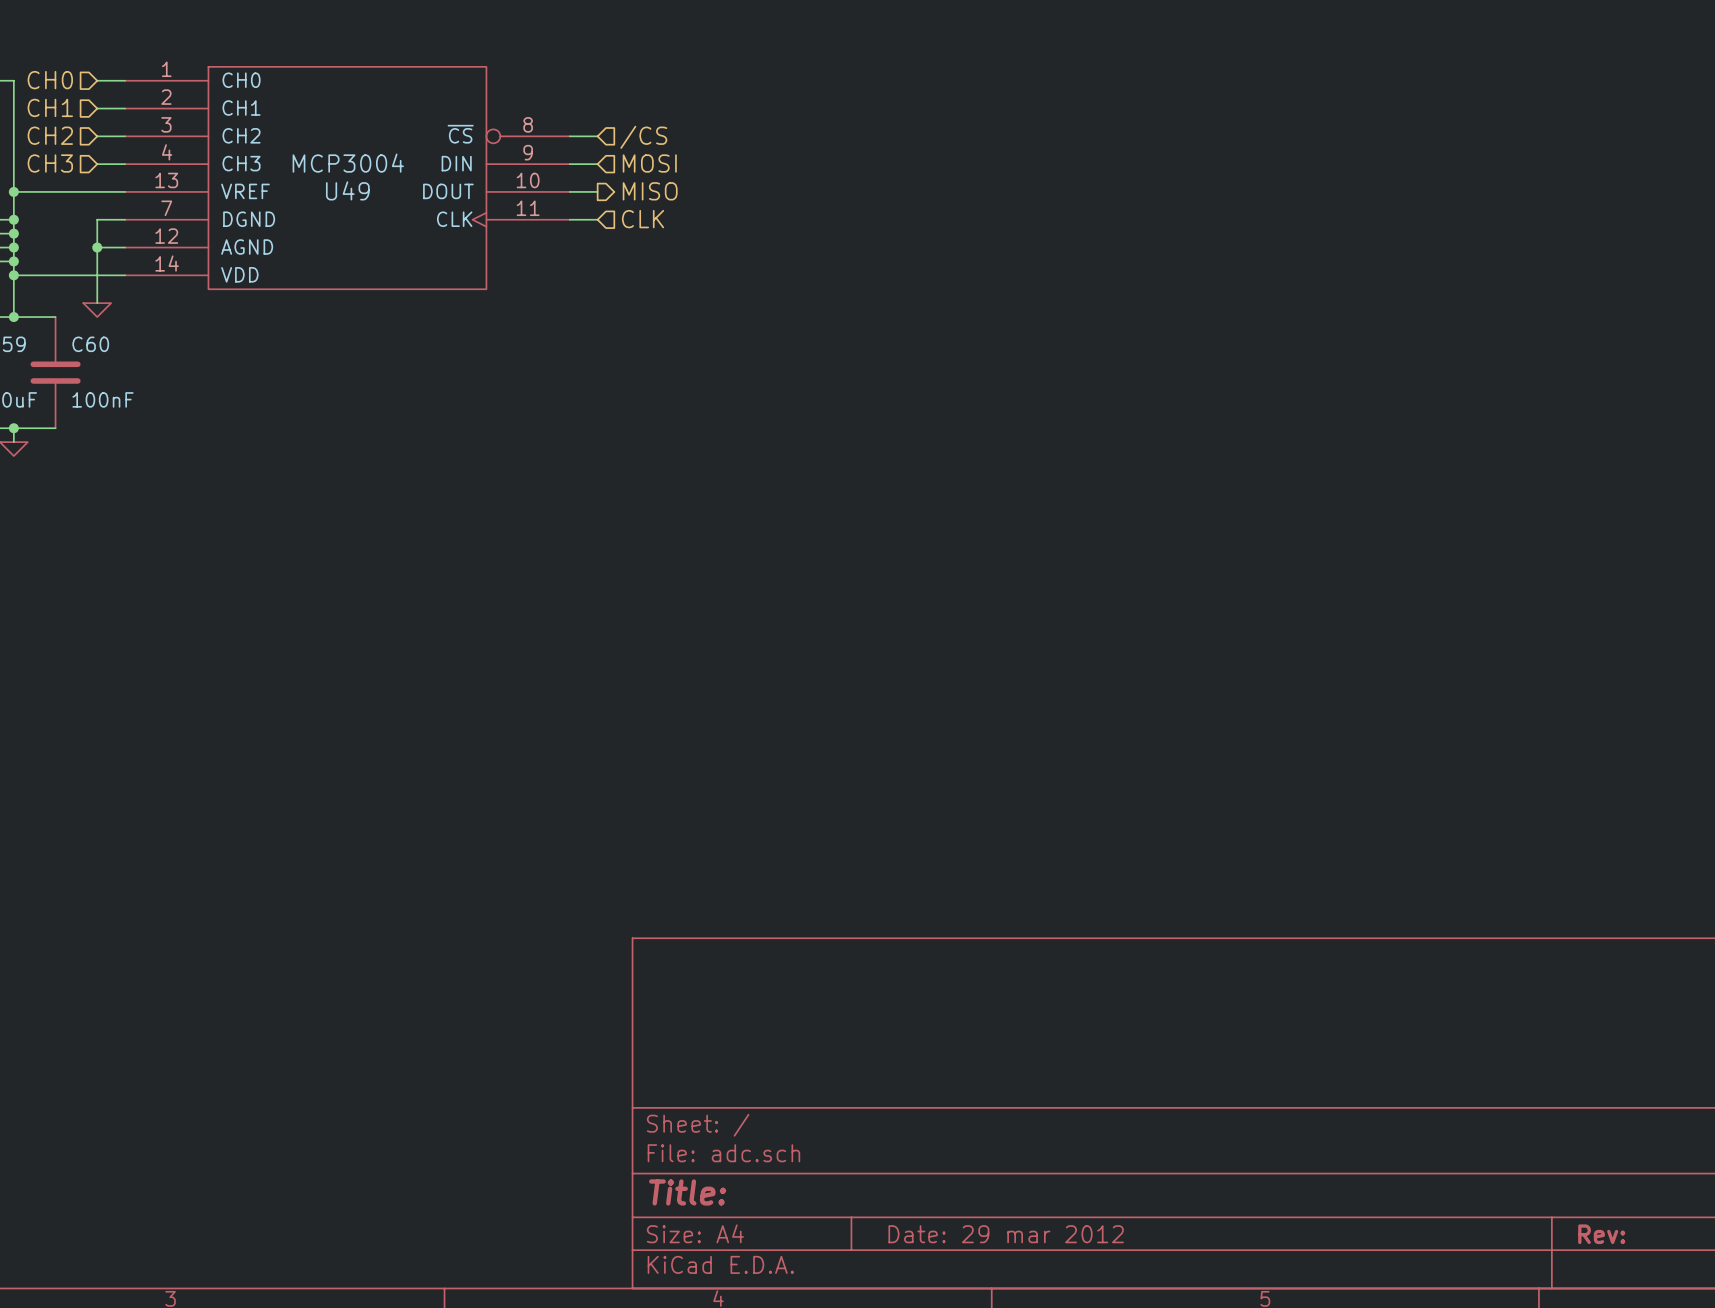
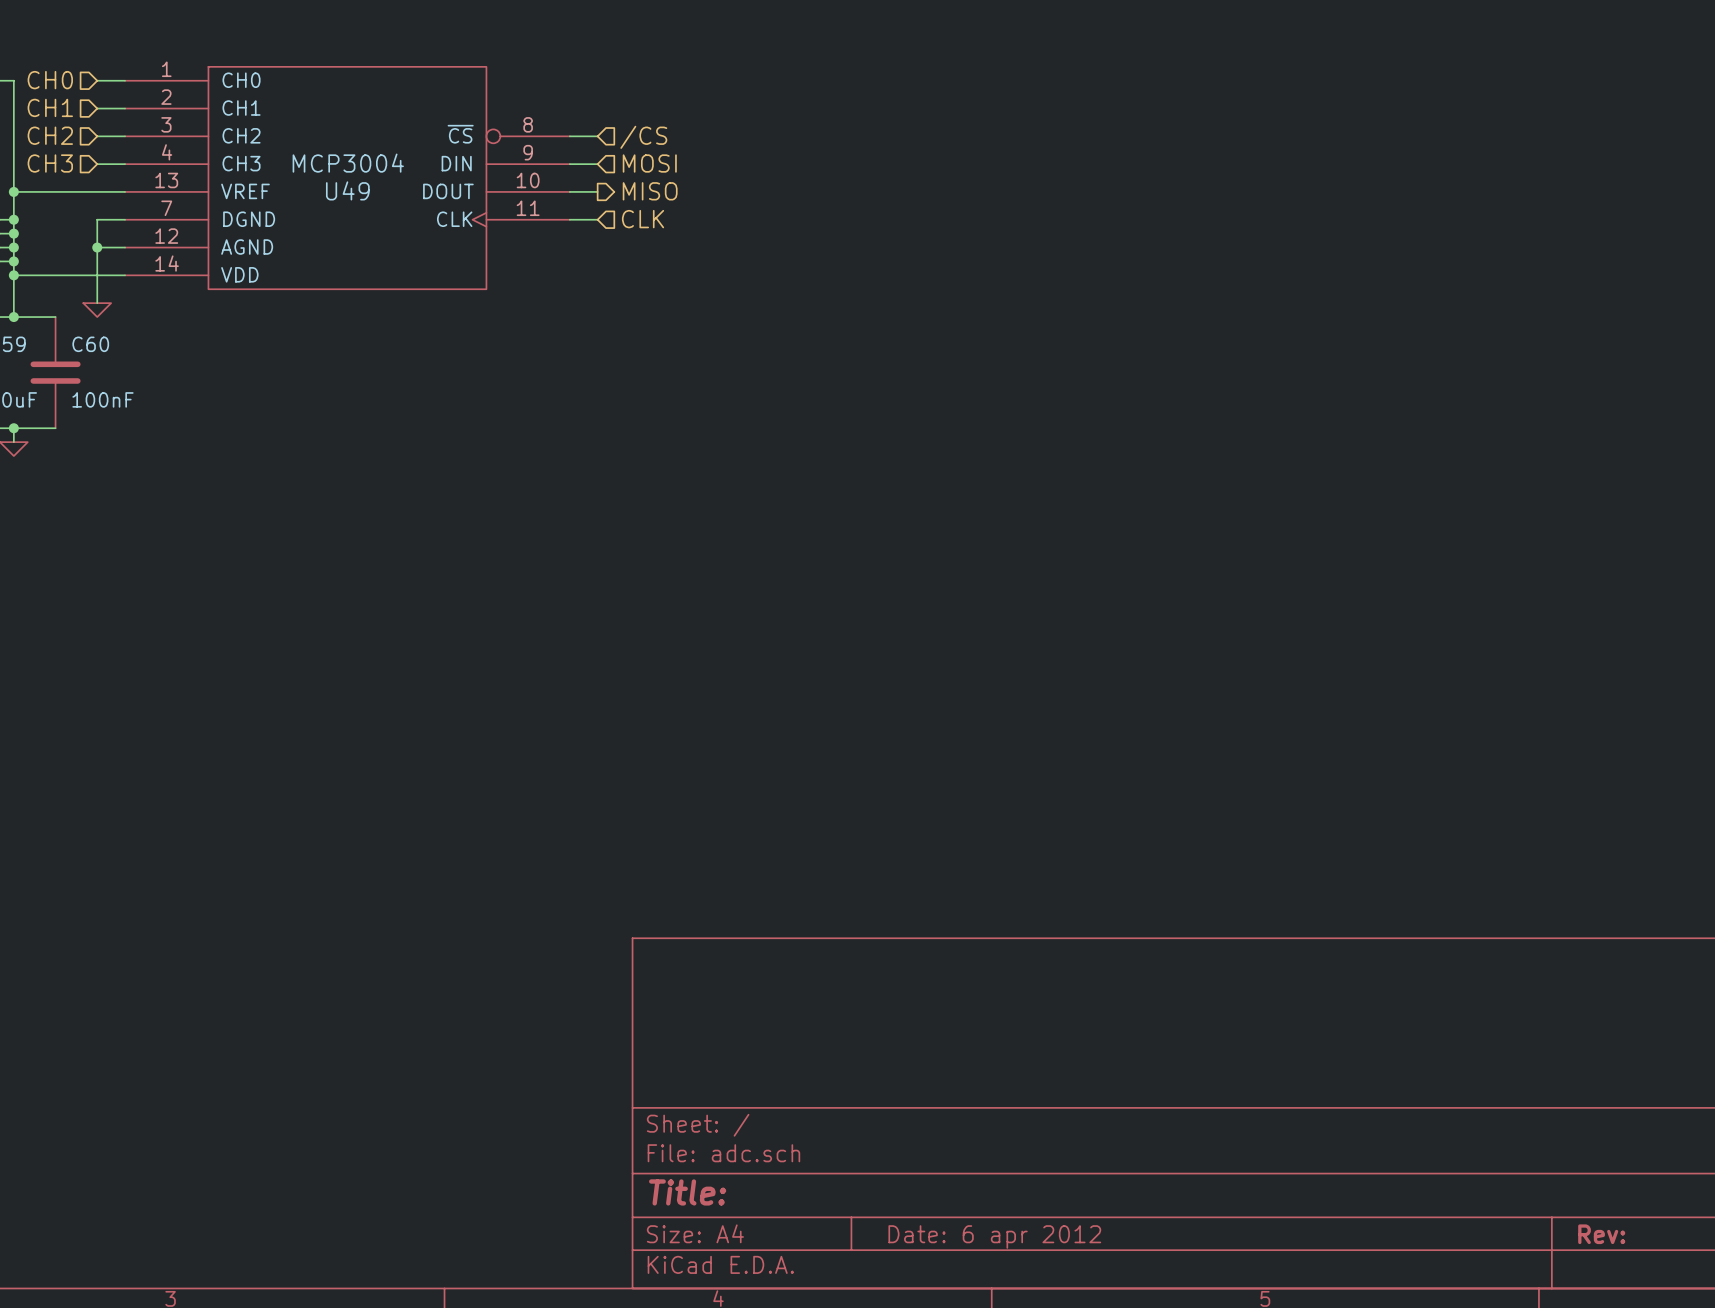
title block: Date: 29 mar 2012 (1006, 1234) -> Date: 6 apr 2012 (994, 1236)

